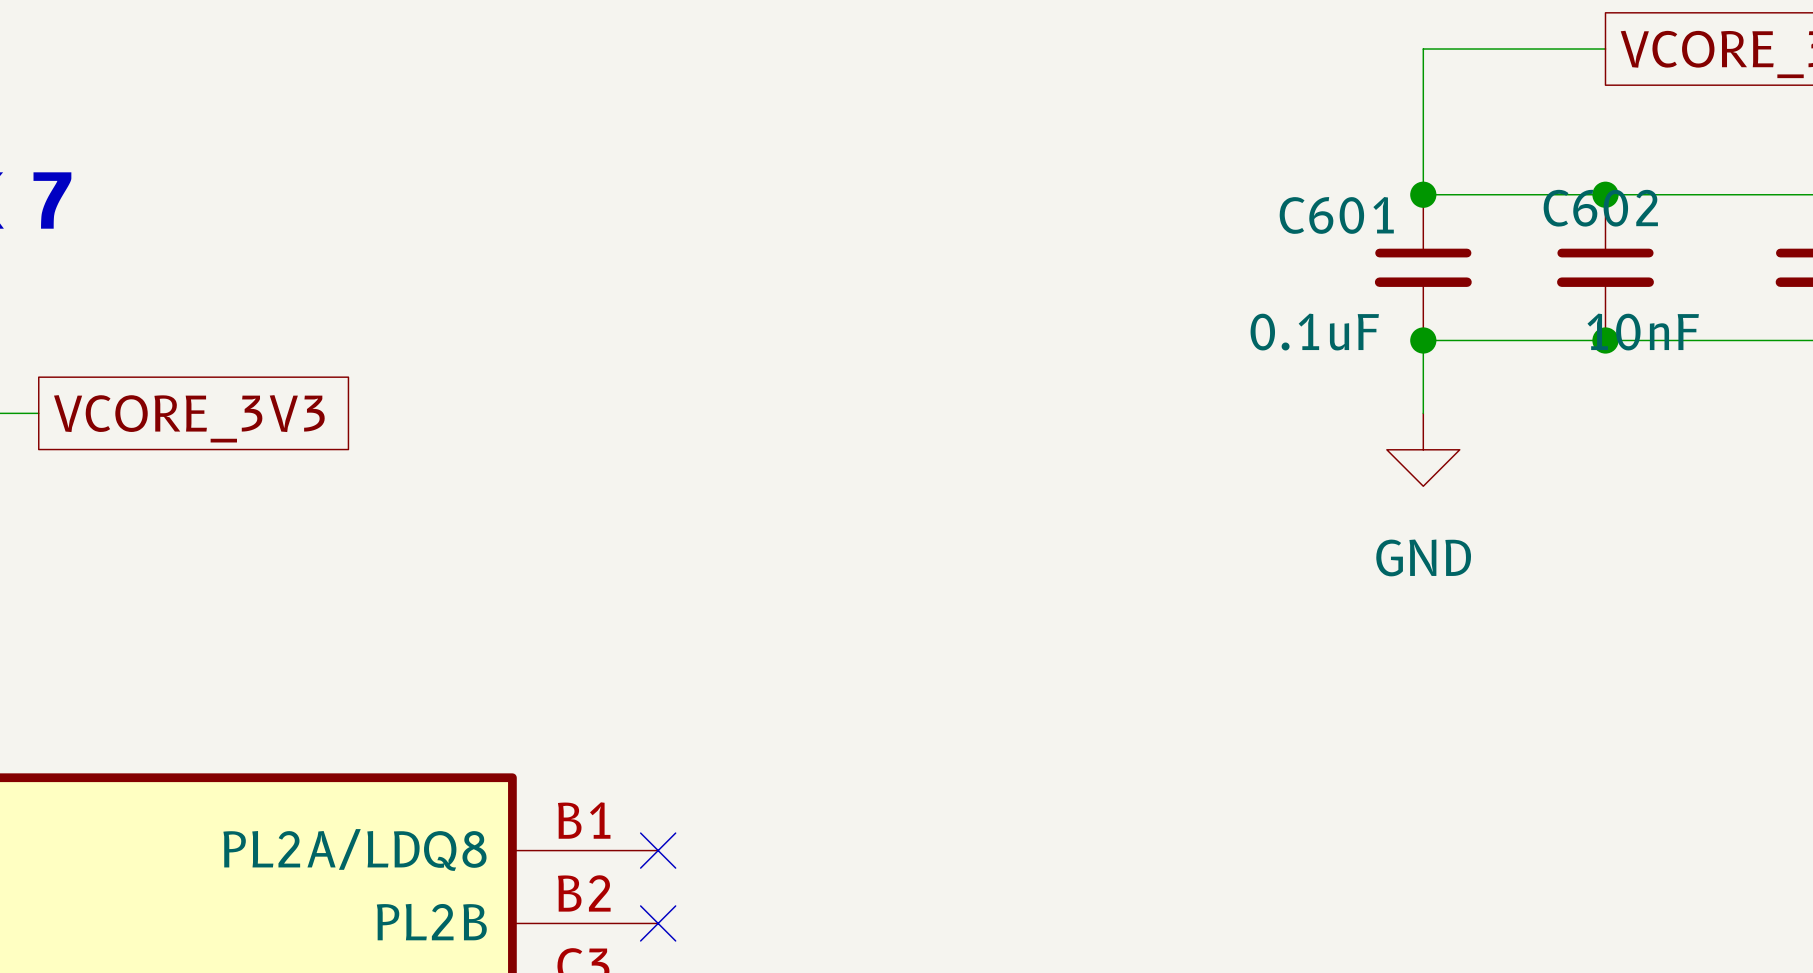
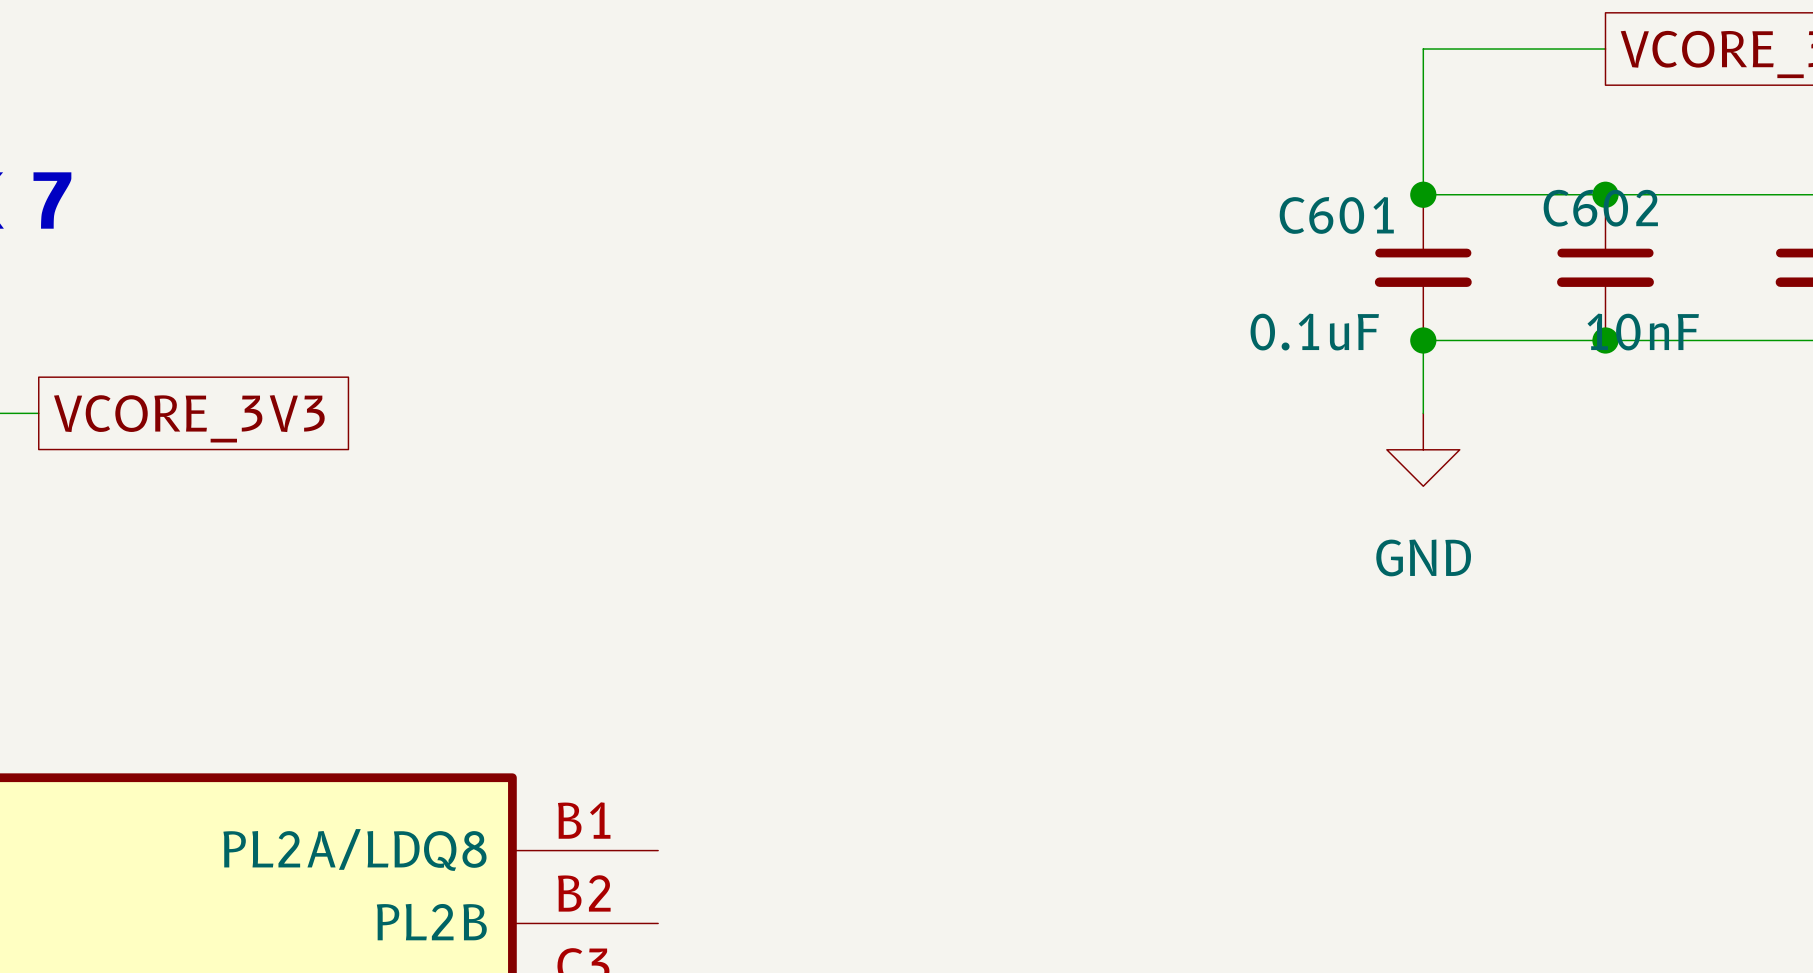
no-connect mark: (658, 850) -> none
no-connect mark: (658, 923) -> none

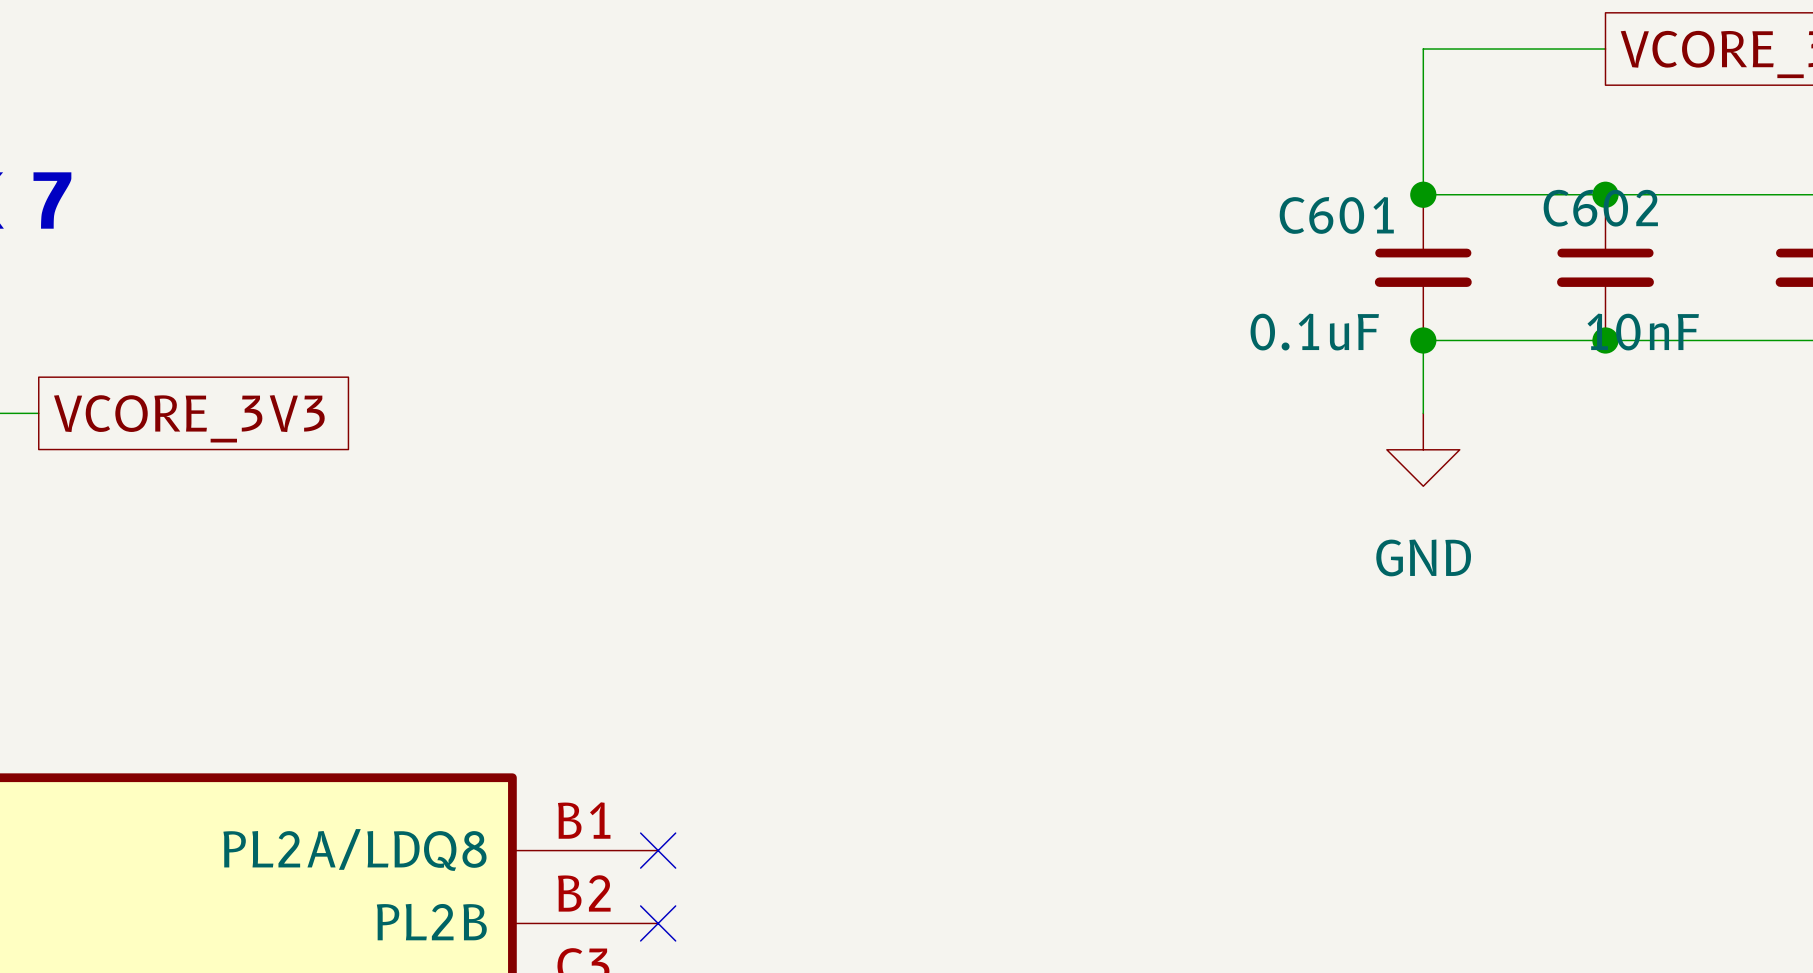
no-connect mark: none -> (658, 850)
no-connect mark: none -> (658, 923)

